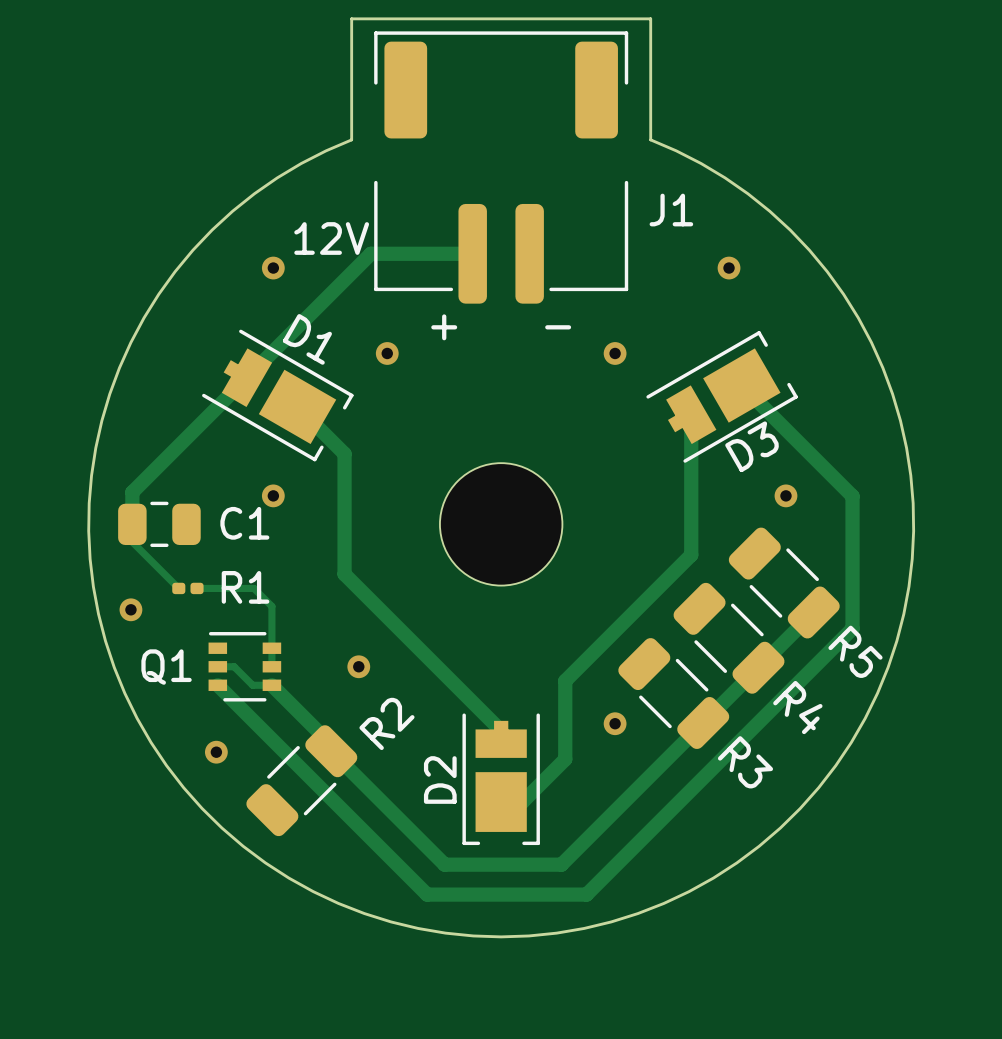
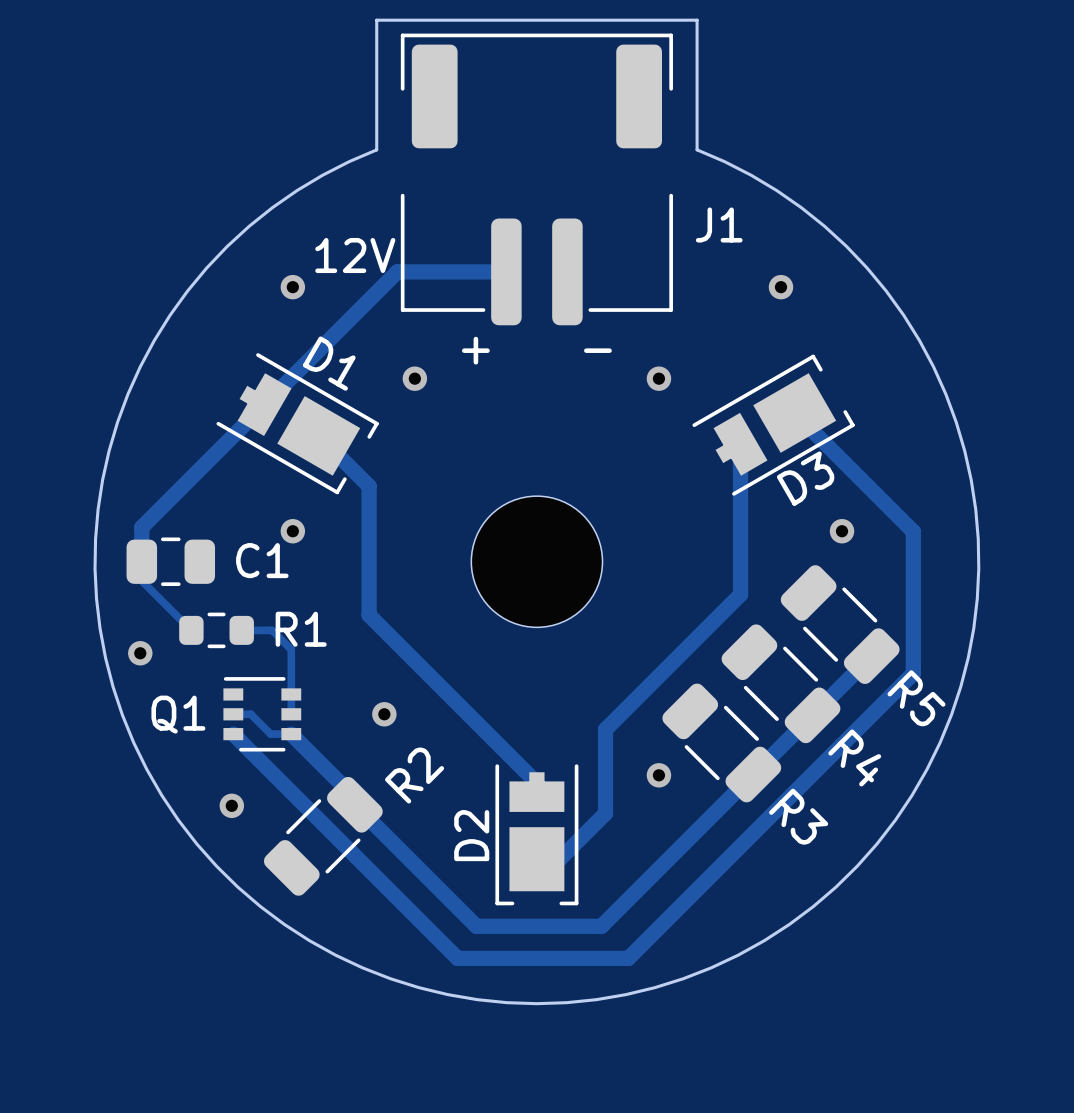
R1 footprint: [172, 582, 204, 595] -> [179, 612, 254, 649]
track: (197, 588) (225, 588) -> none

